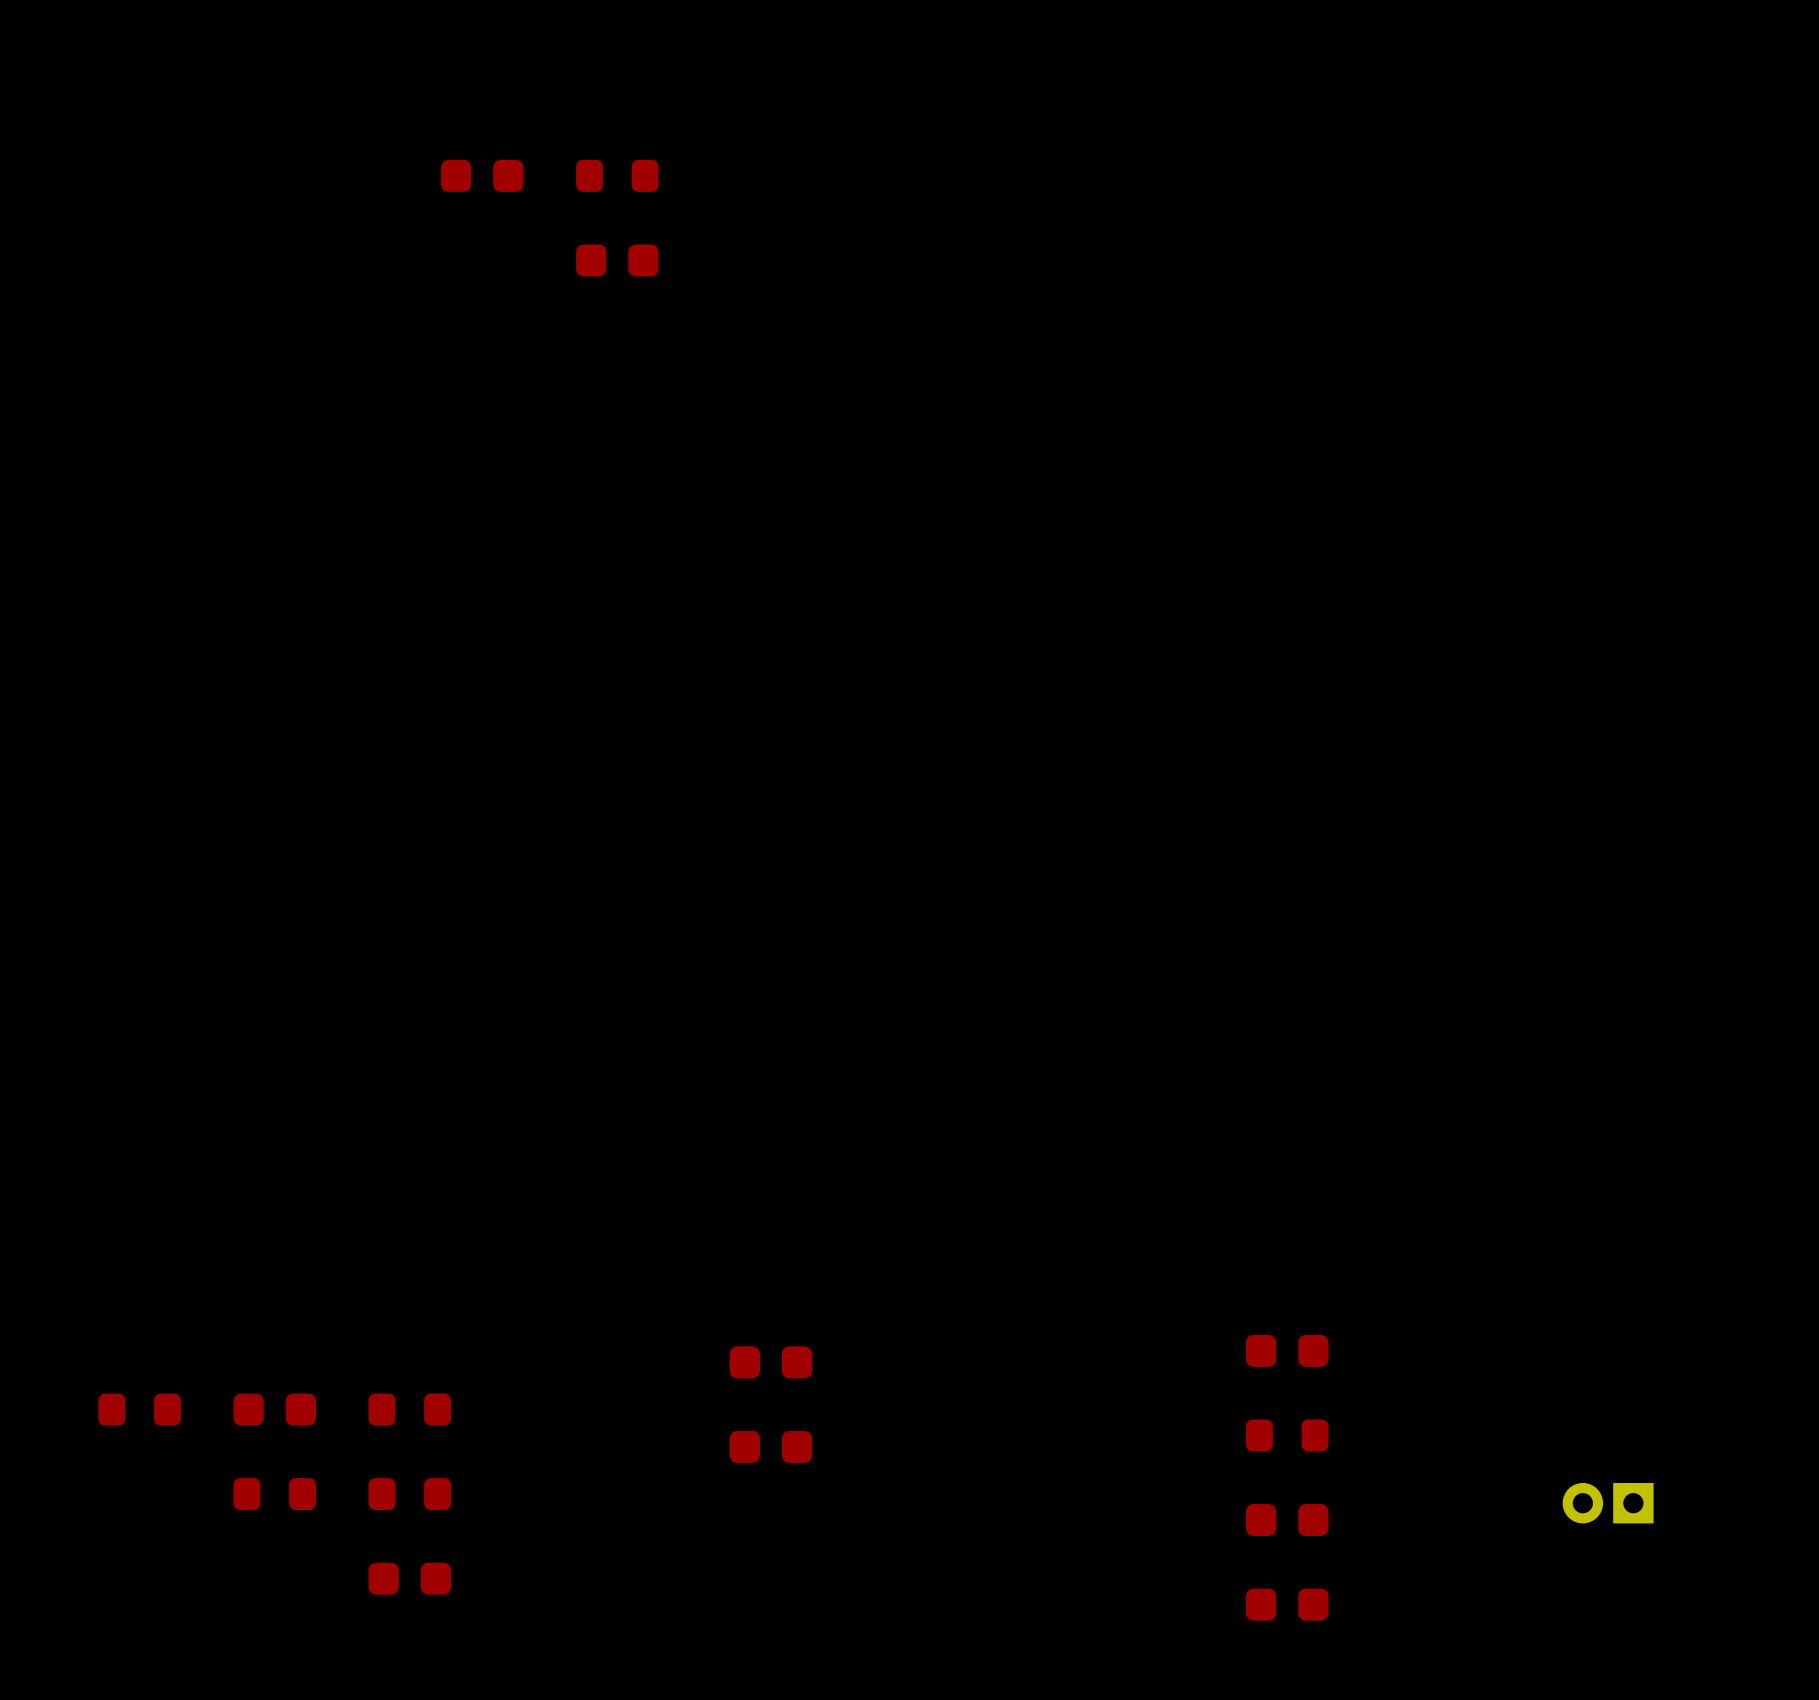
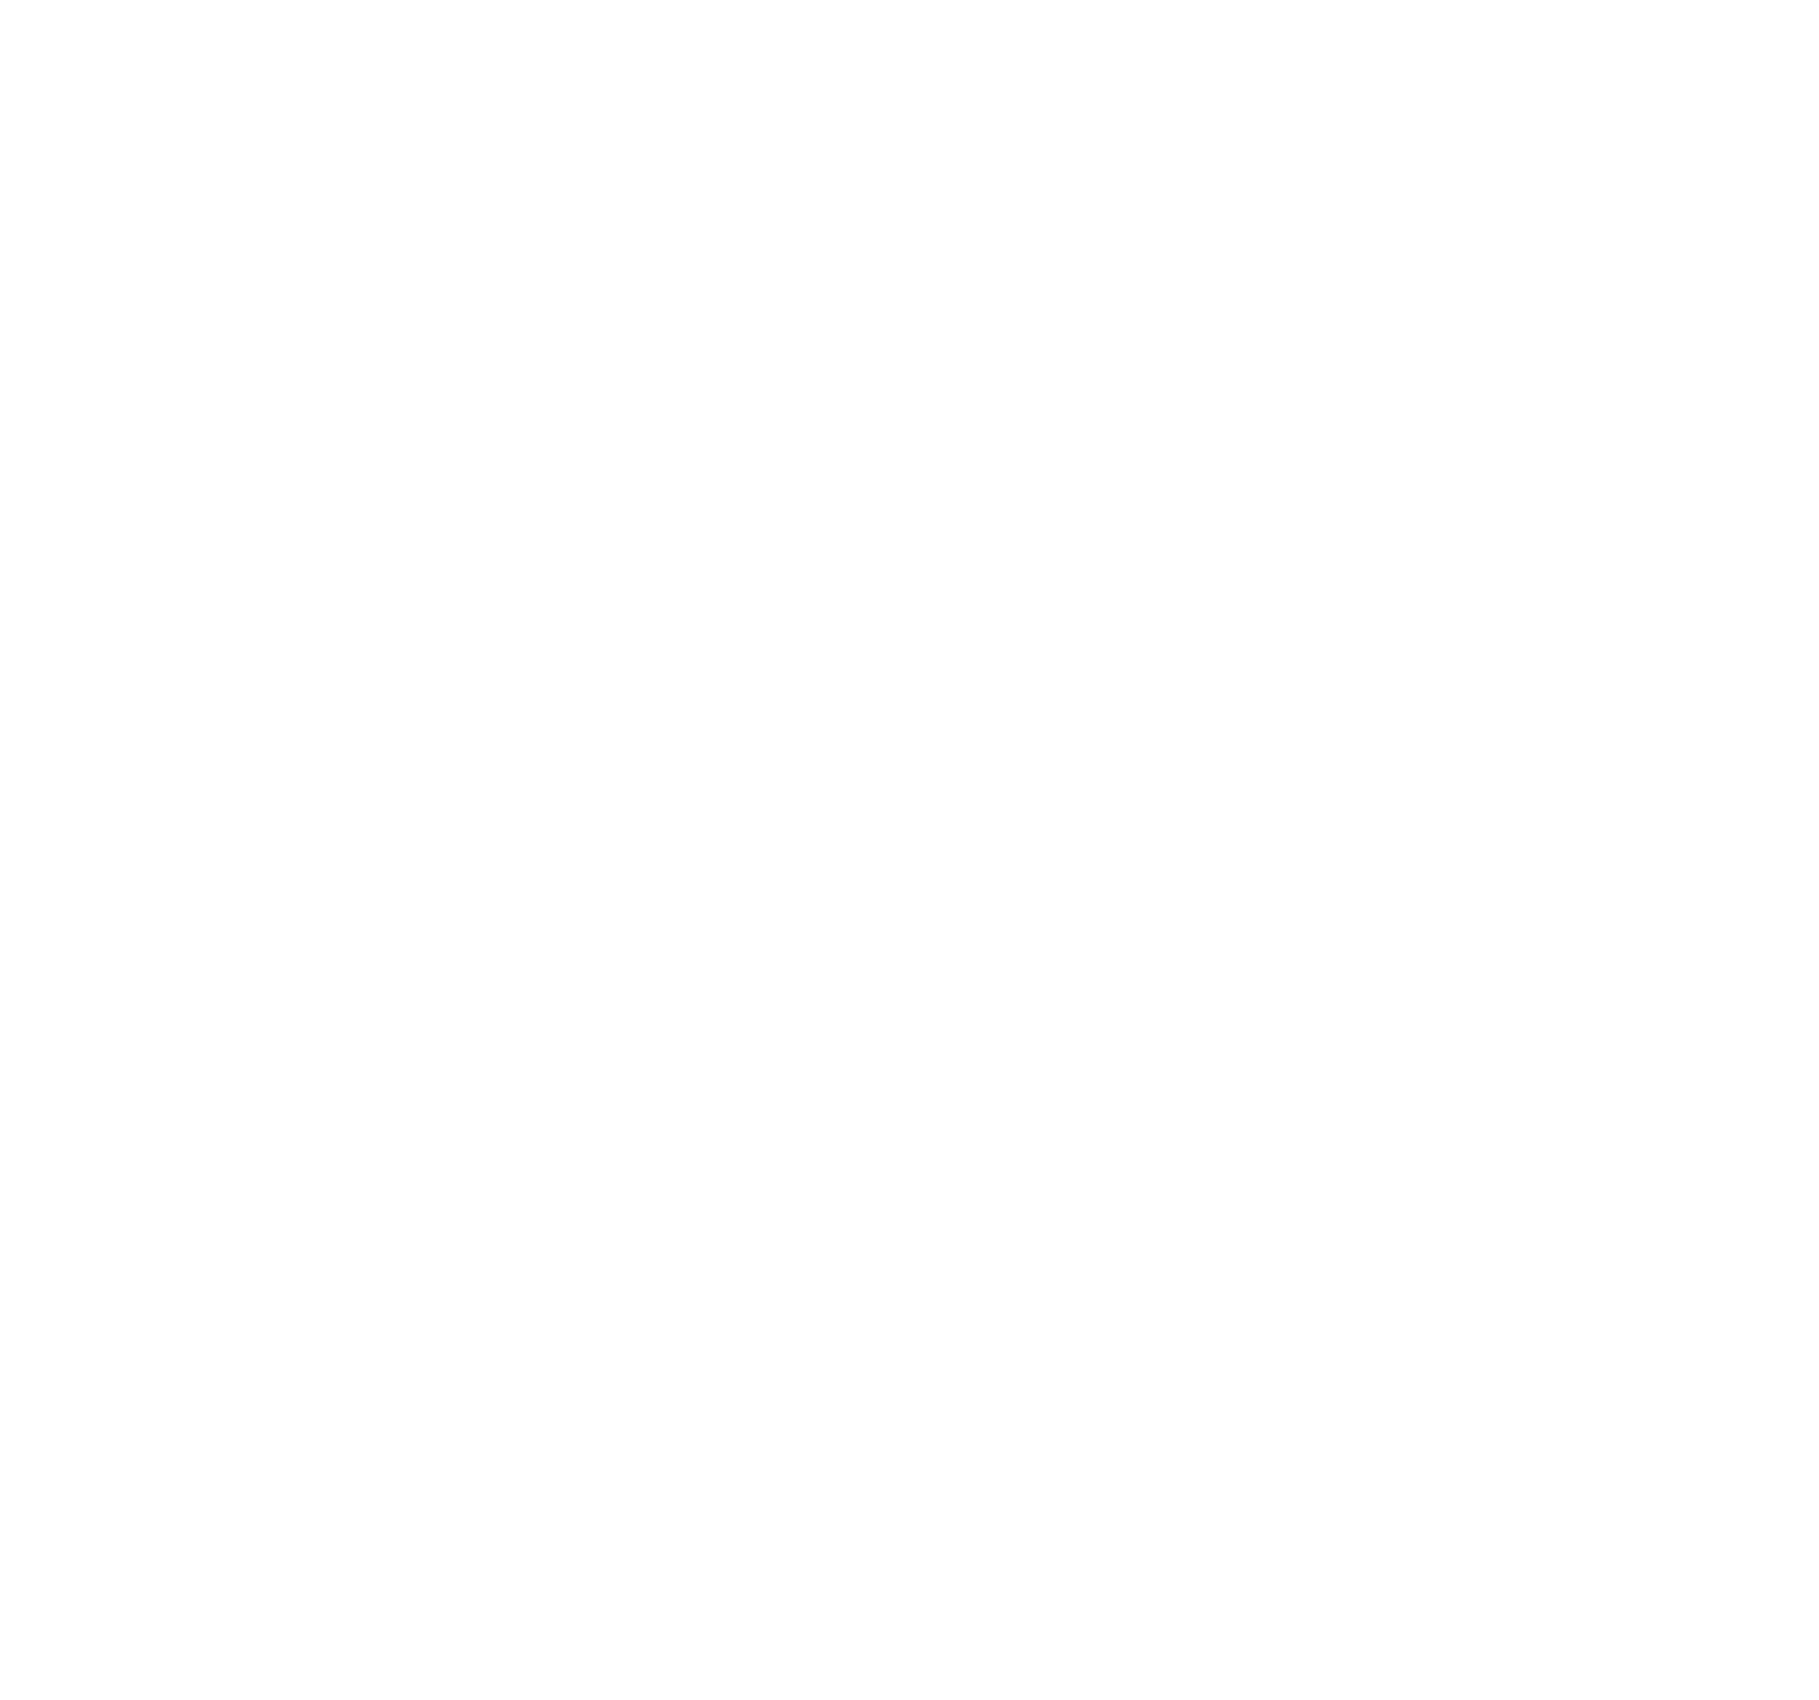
part: (482, 175) -> none
part: (617, 175) -> none
part: (617, 260) -> none
part: (1287, 1350) -> none
part: (770, 1362) -> none
part: (139, 1409) -> none
part: (274, 1409) -> none
part: (409, 1409) -> none
part: (1287, 1435) -> none
part: (770, 1446) -> none
part: (274, 1494) -> none
part: (409, 1494) -> none
part: (1608, 1503) -> none
part: (1287, 1520) -> none
part: (409, 1578) -> none
part: (1287, 1604) -> none

